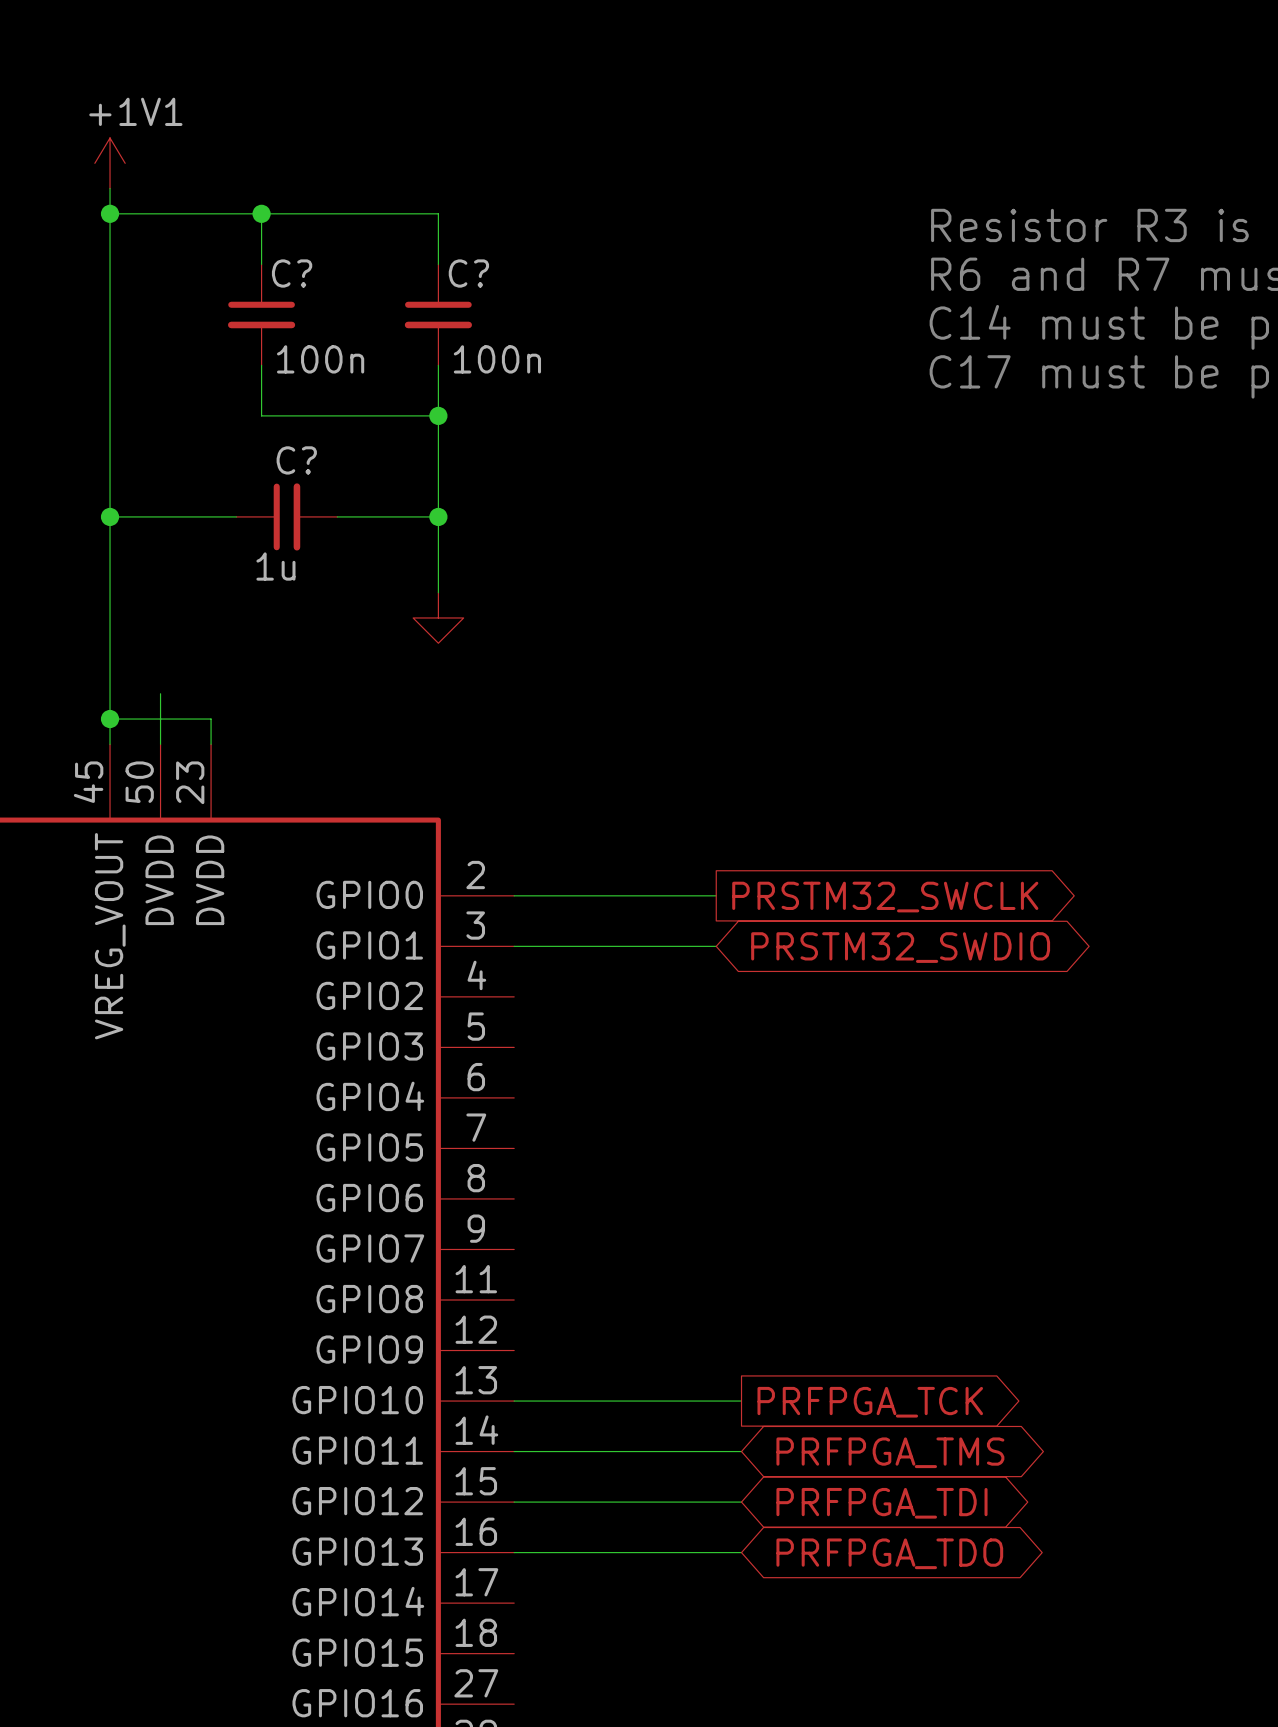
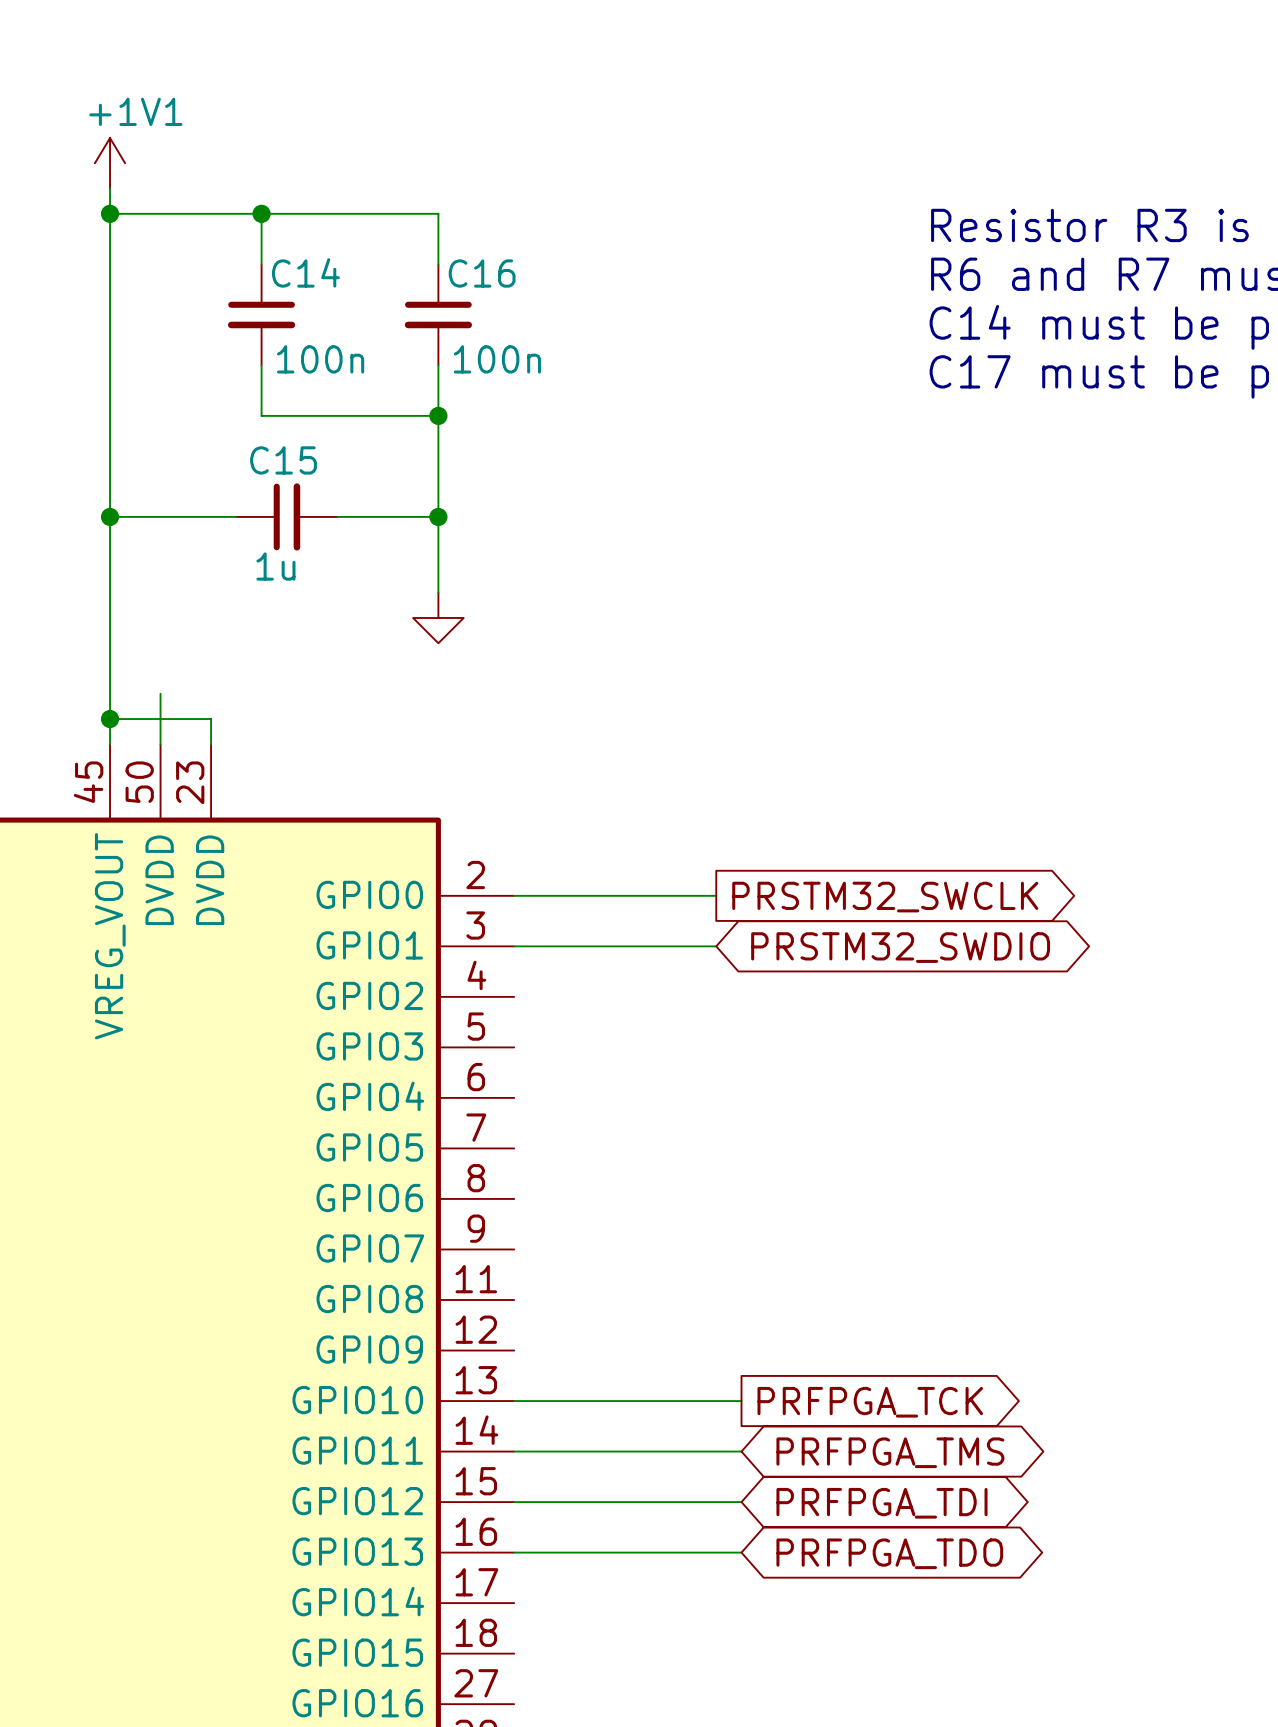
C? name: C? (292, 273) -> C14 (305, 272)
C? name: C? (468, 273) -> C16 (482, 273)
C? name: C? (296, 460) -> C15 (283, 460)

